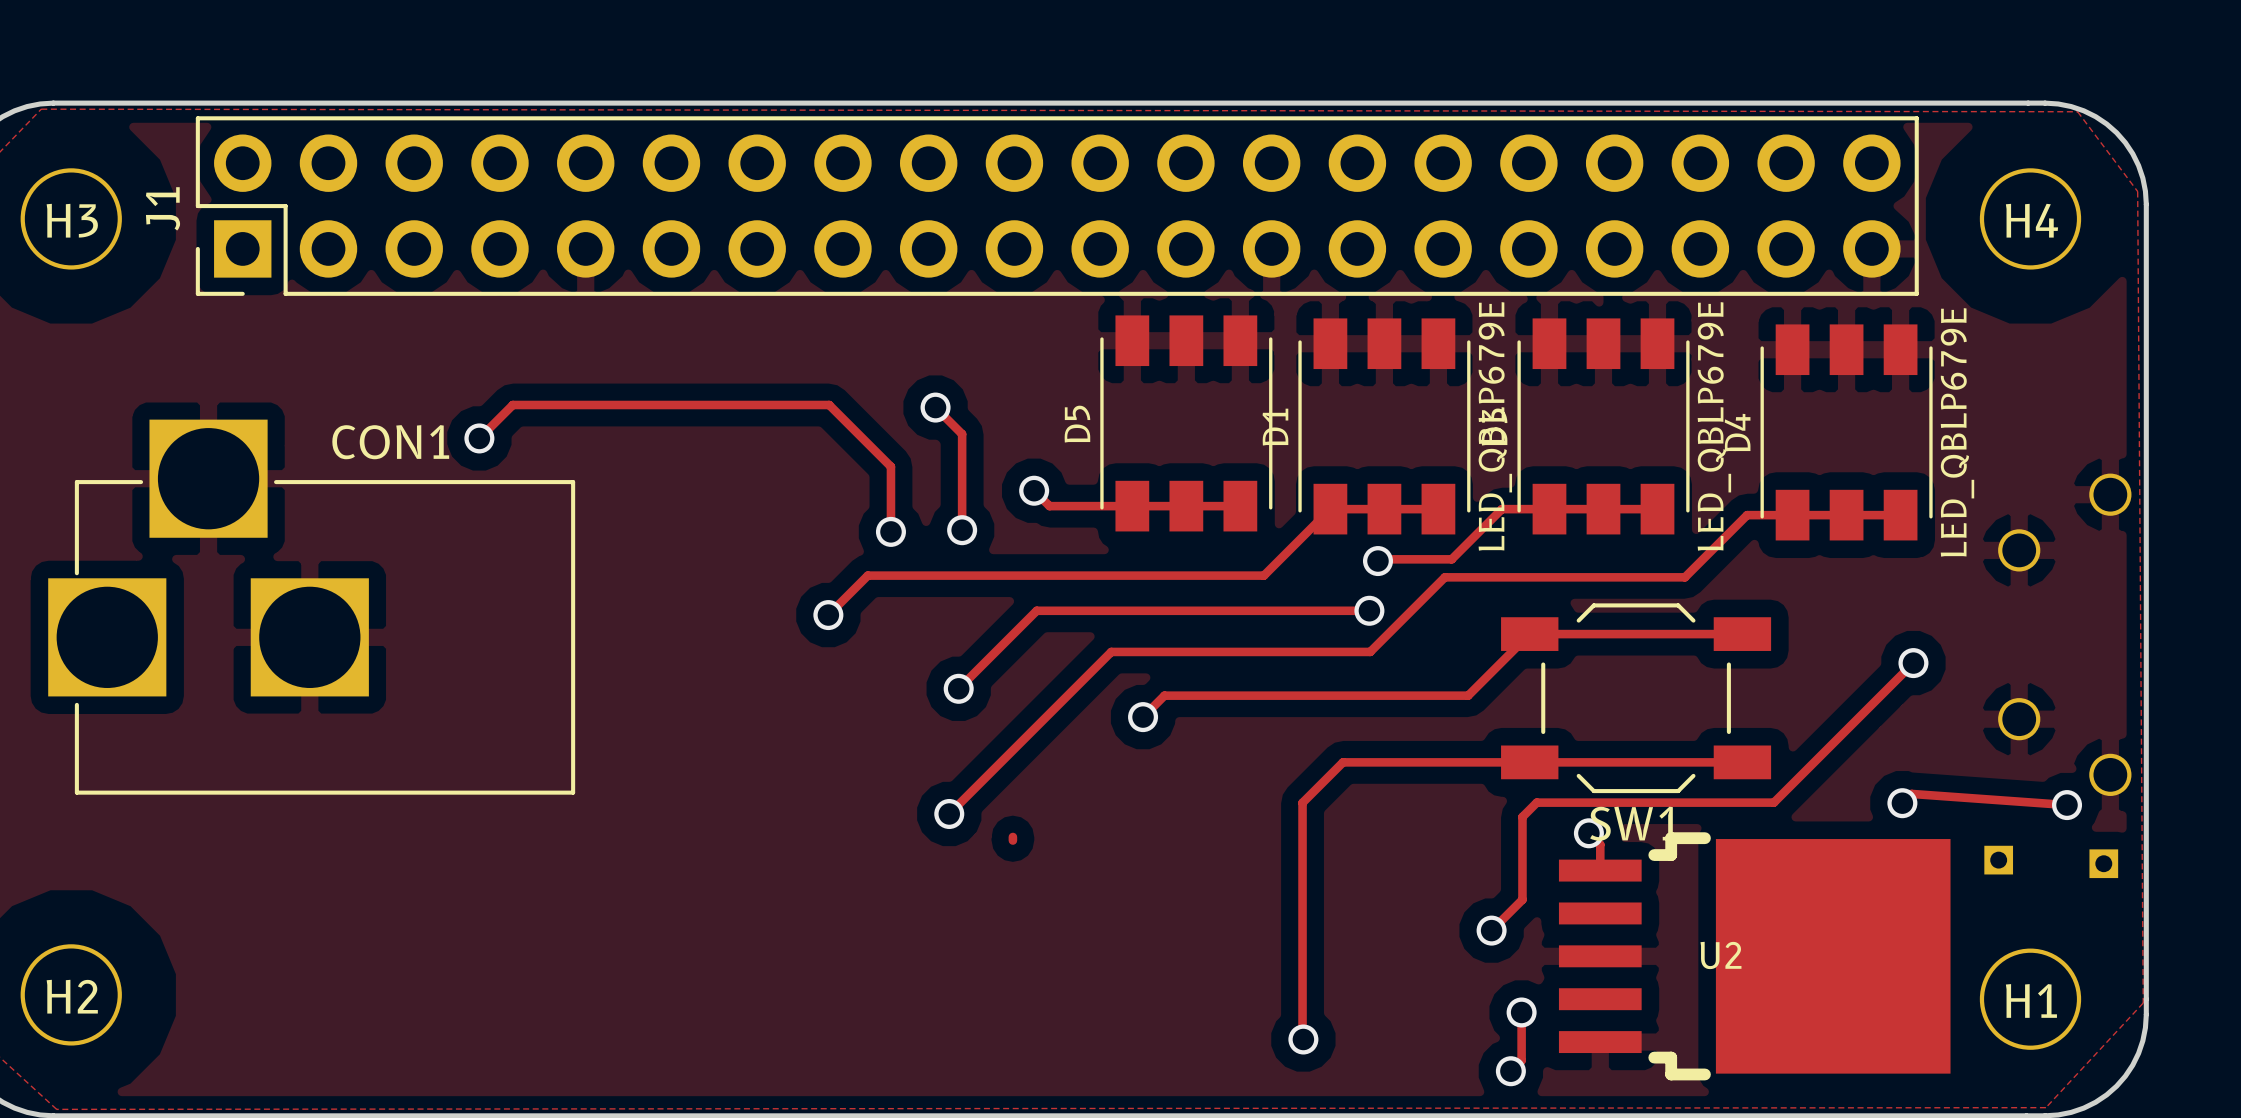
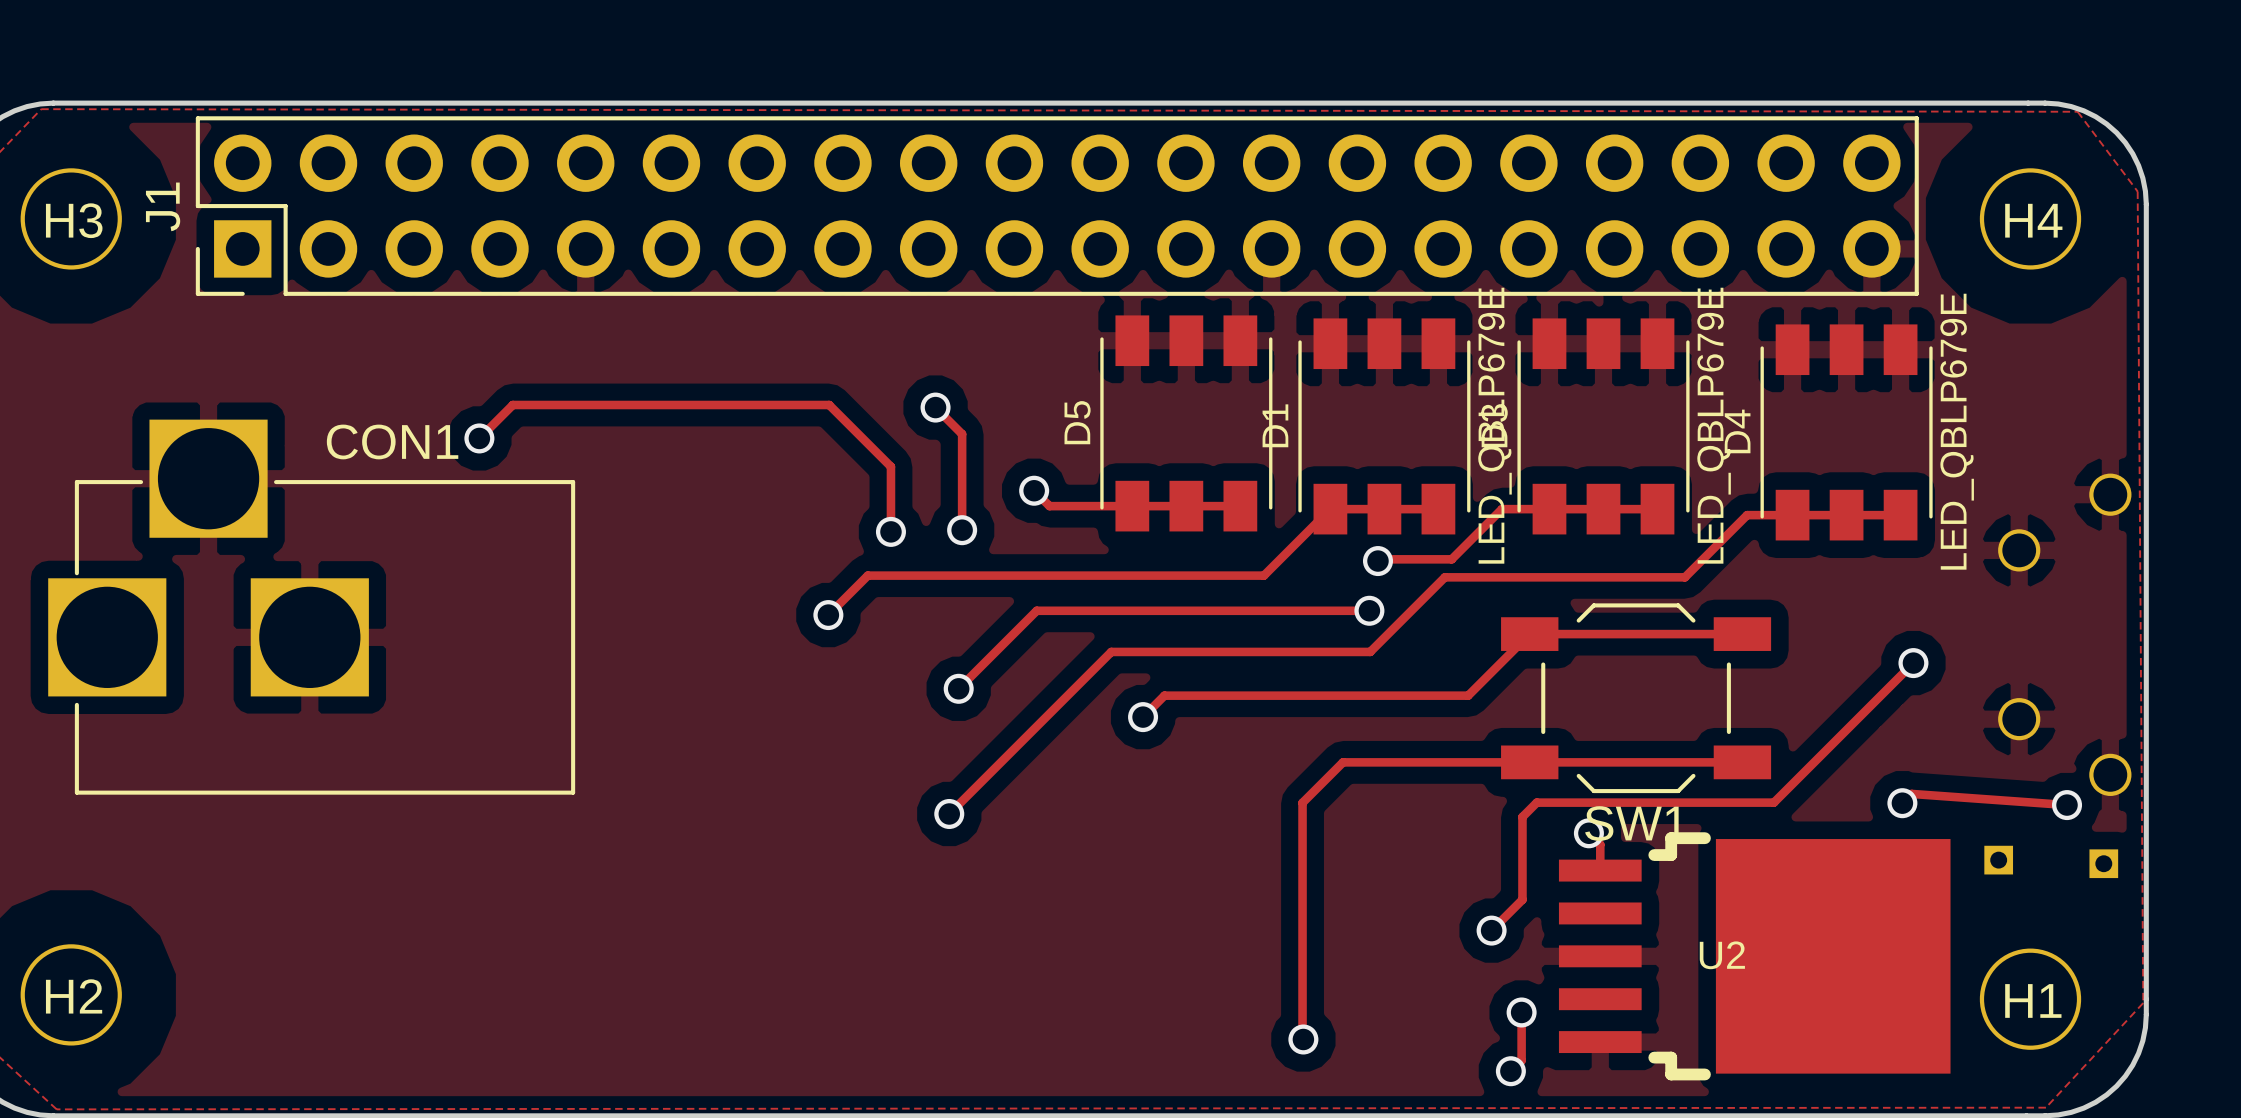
track: (1012, 836) (1012, 840) -> none

